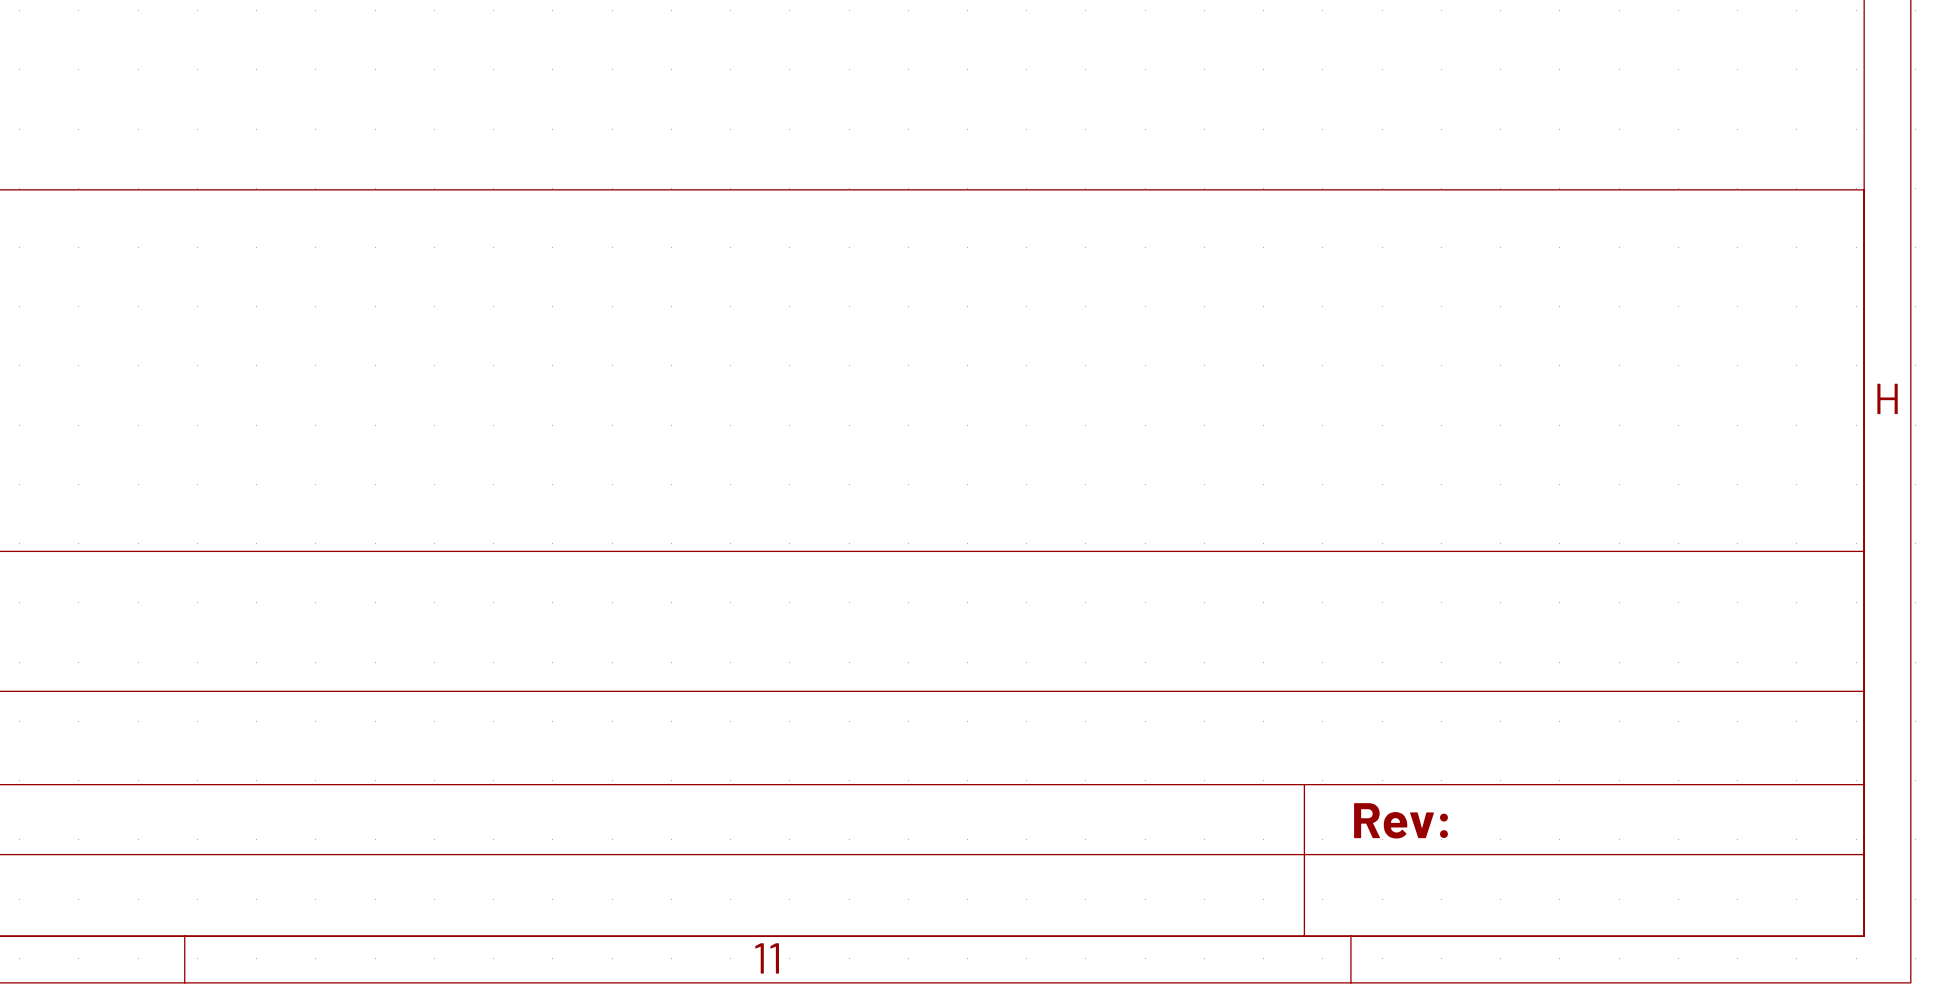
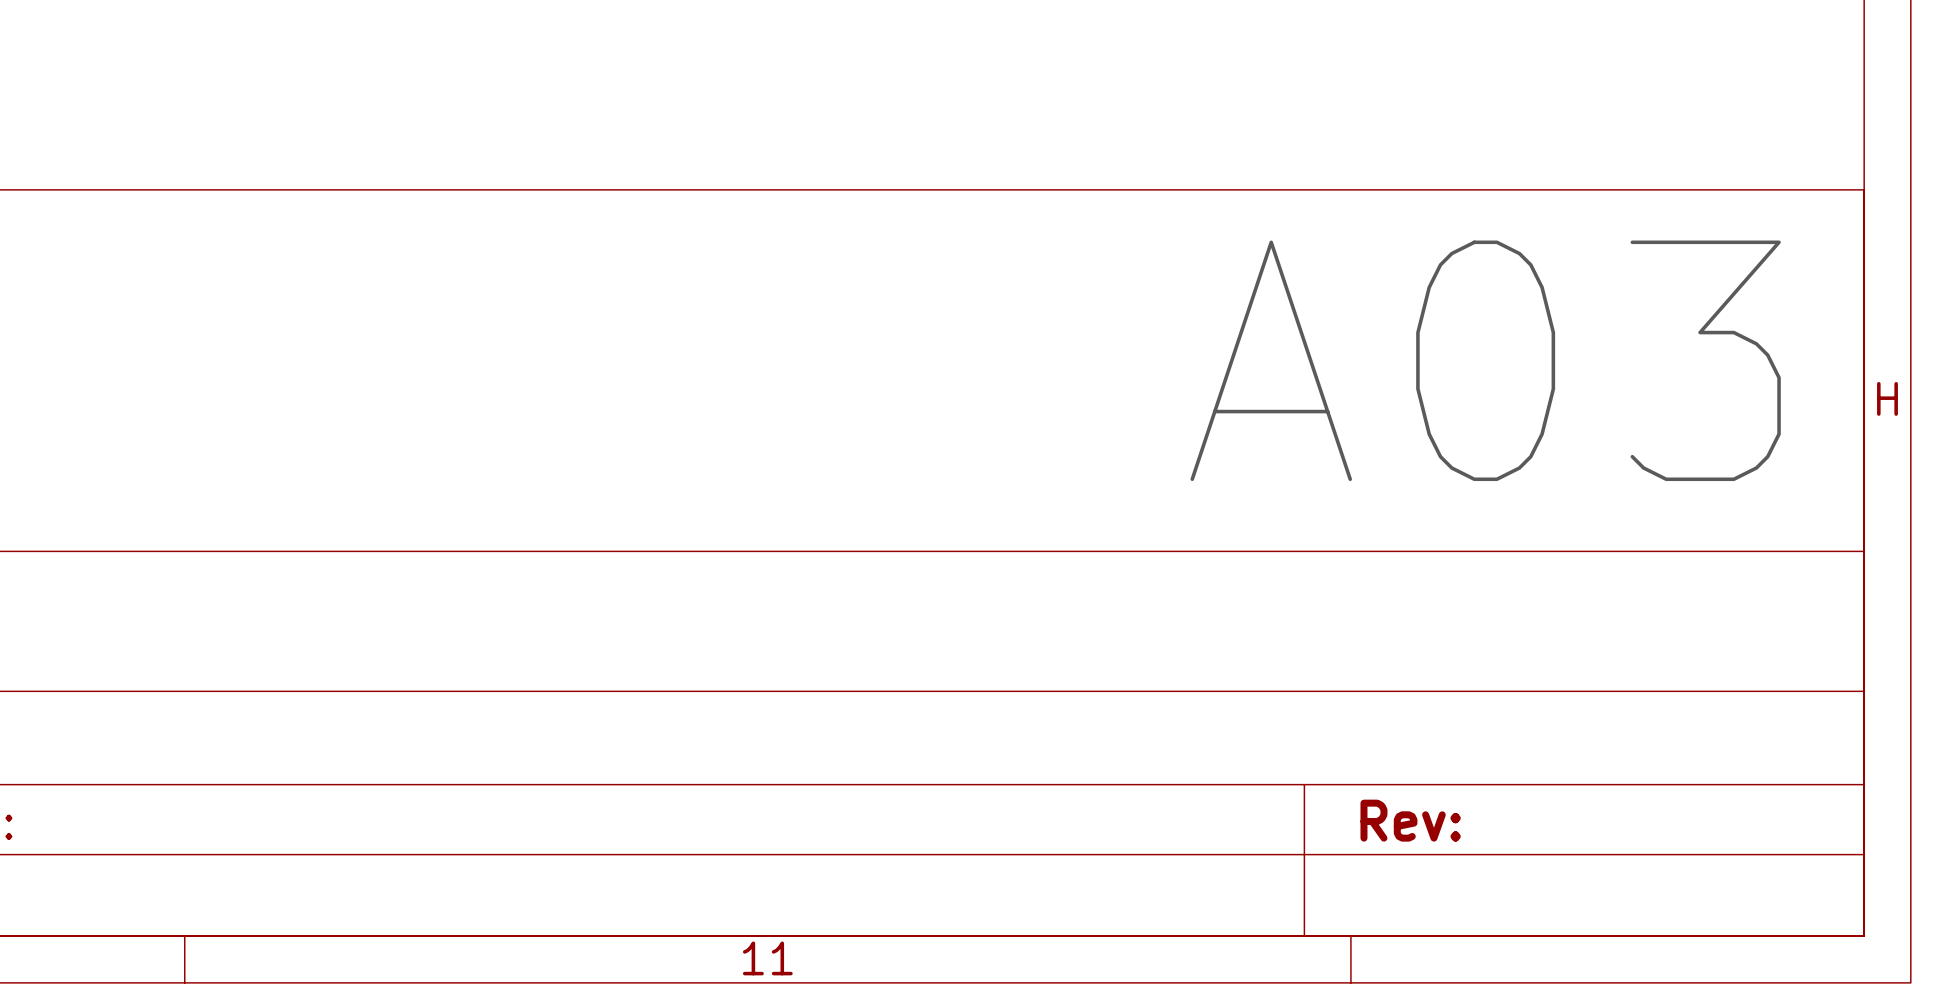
text: none -> A03 (1485, 360)

